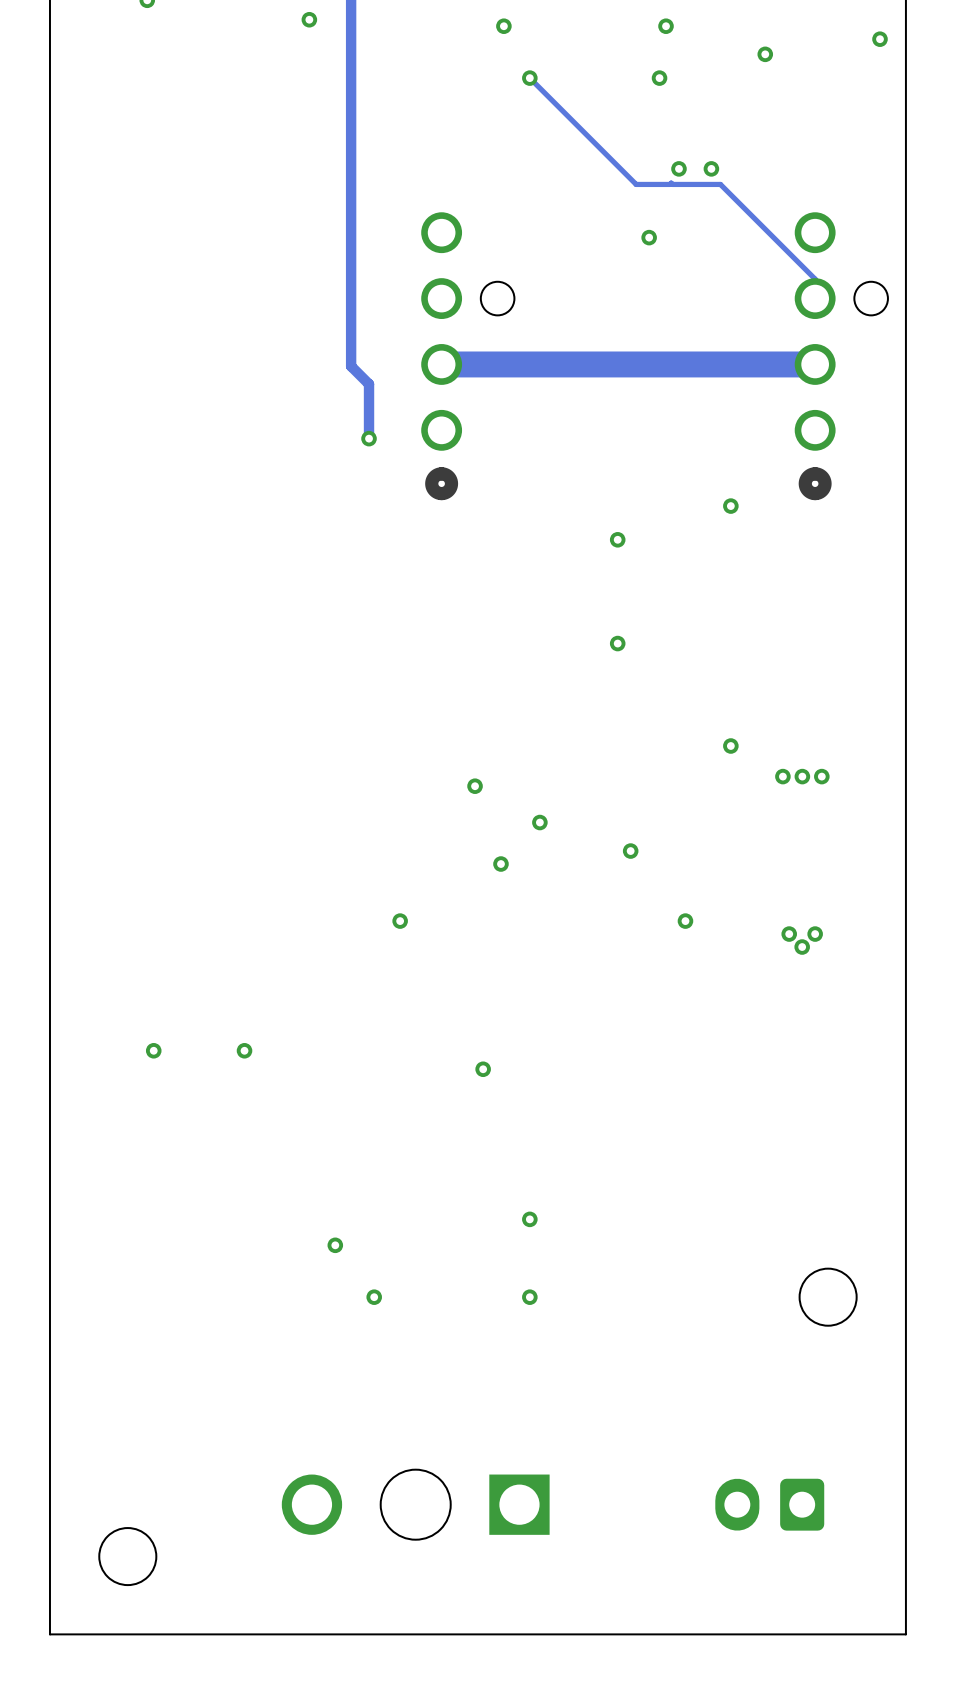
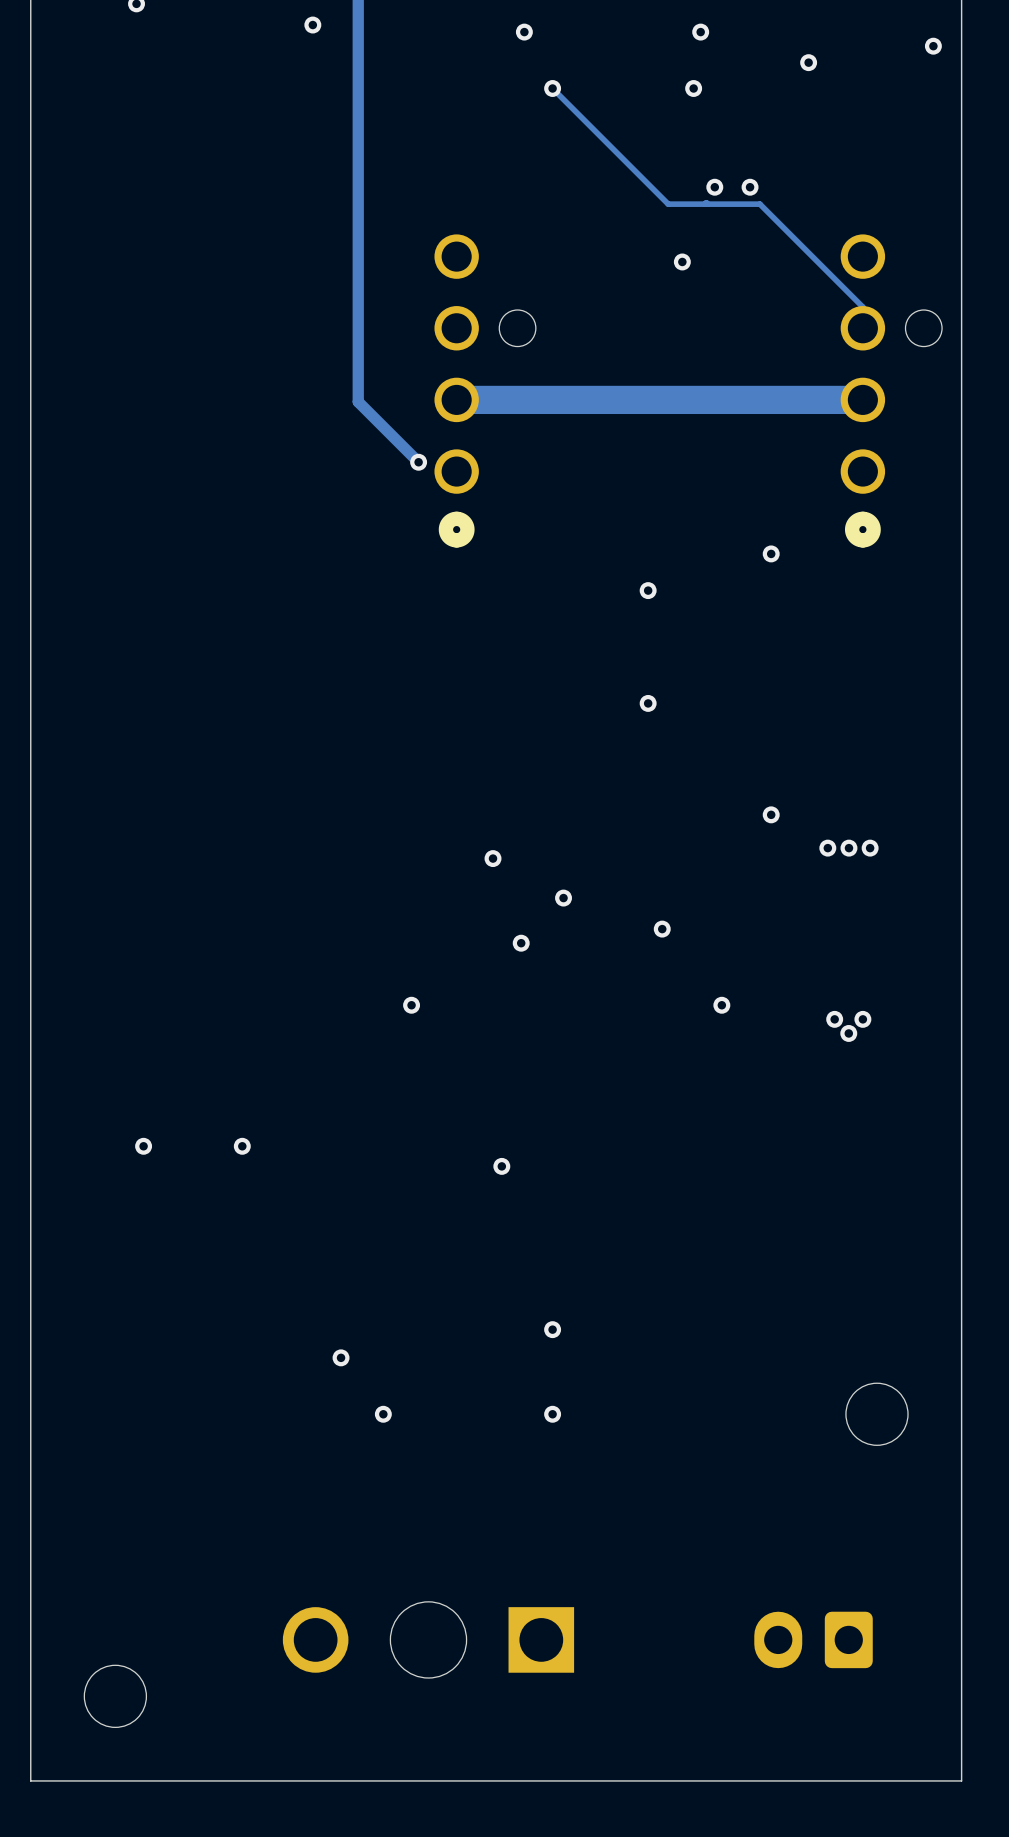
track: (369, 384) (369, 438) -> (377, 421) (418, 462)
via position: (369, 438) -> (418, 462)

